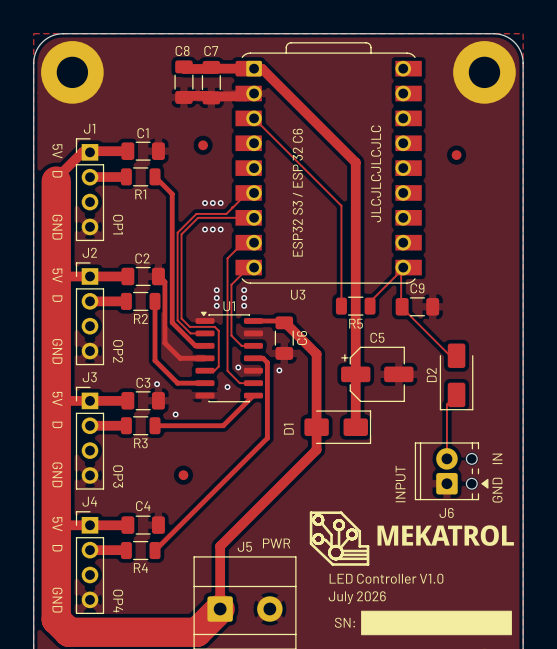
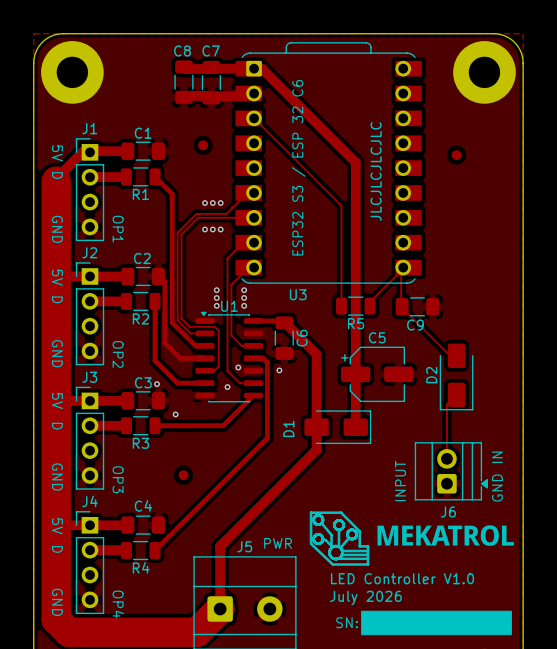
C9 name position: C9 (417, 288) -> C9 (415, 325)
J6 footprint: [414, 442, 489, 501] -> [414, 442, 488, 501]

